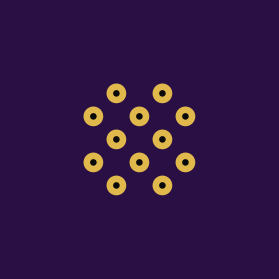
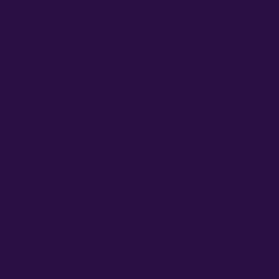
part: (139, 139) -> none

